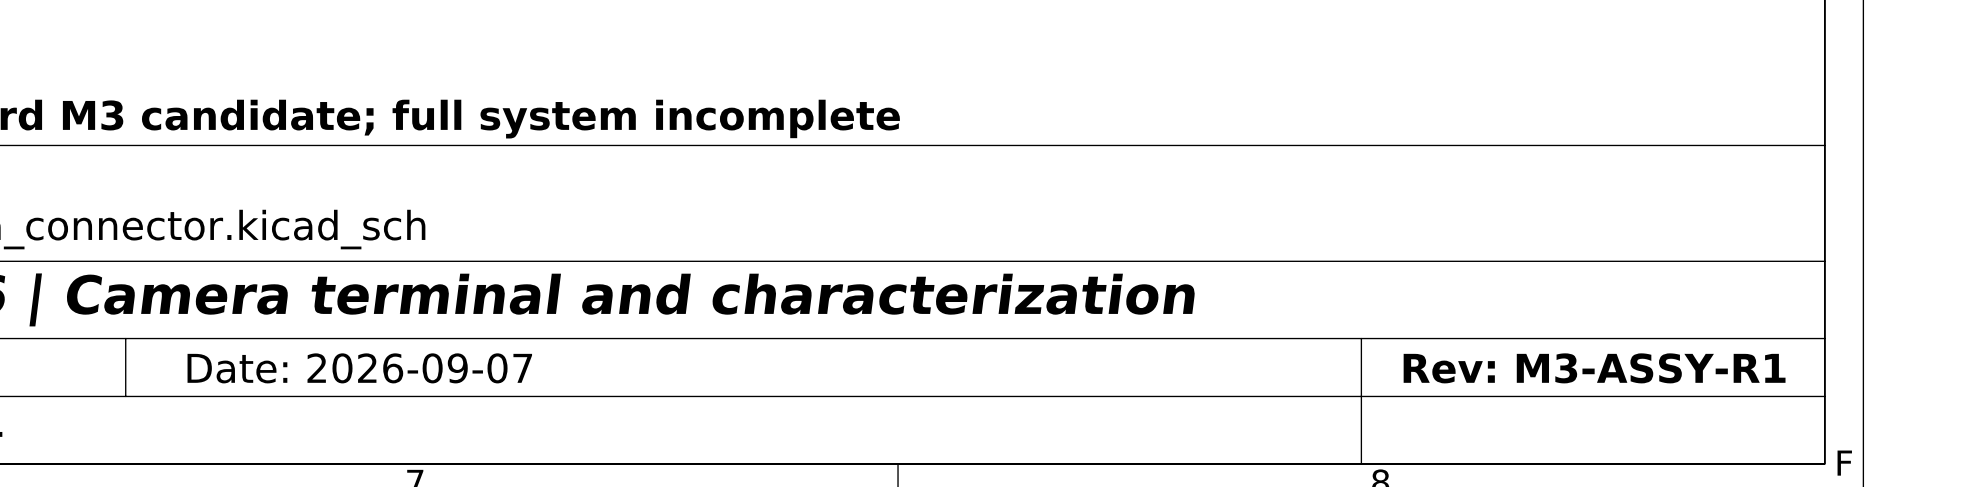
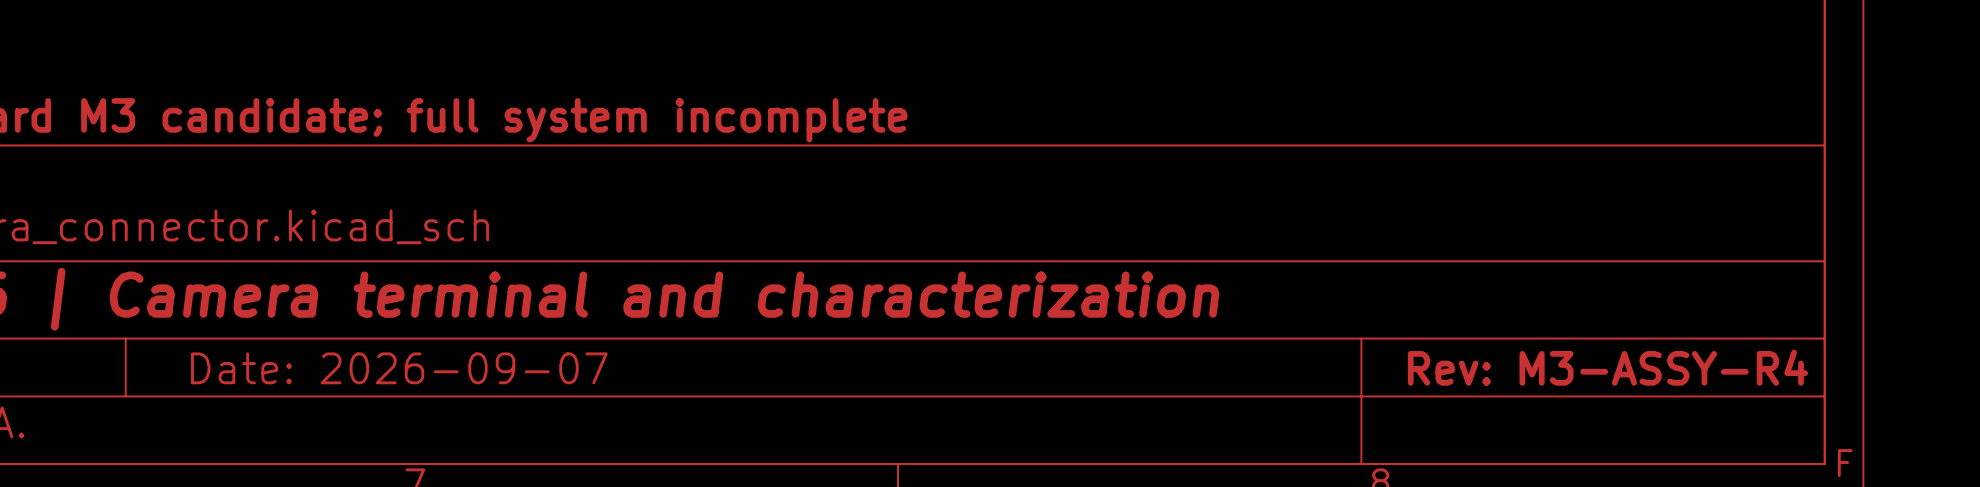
title block: Rev: M3-ASSY-R1 (1594, 368) -> Rev: M3-ASSY-R4 (1607, 367)

